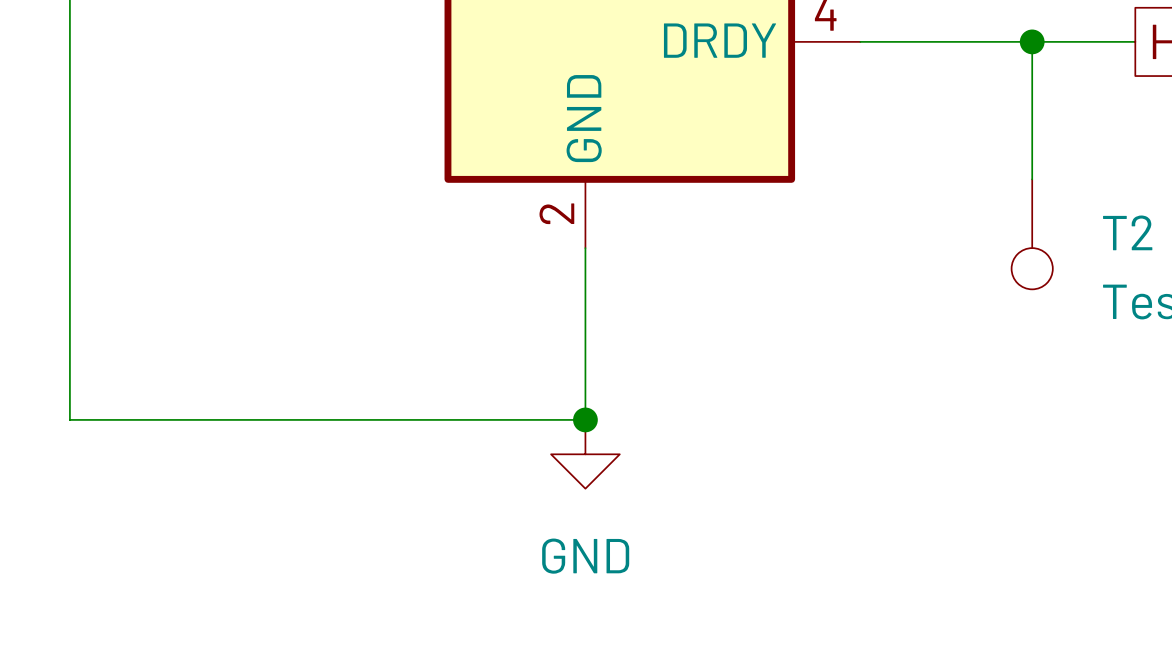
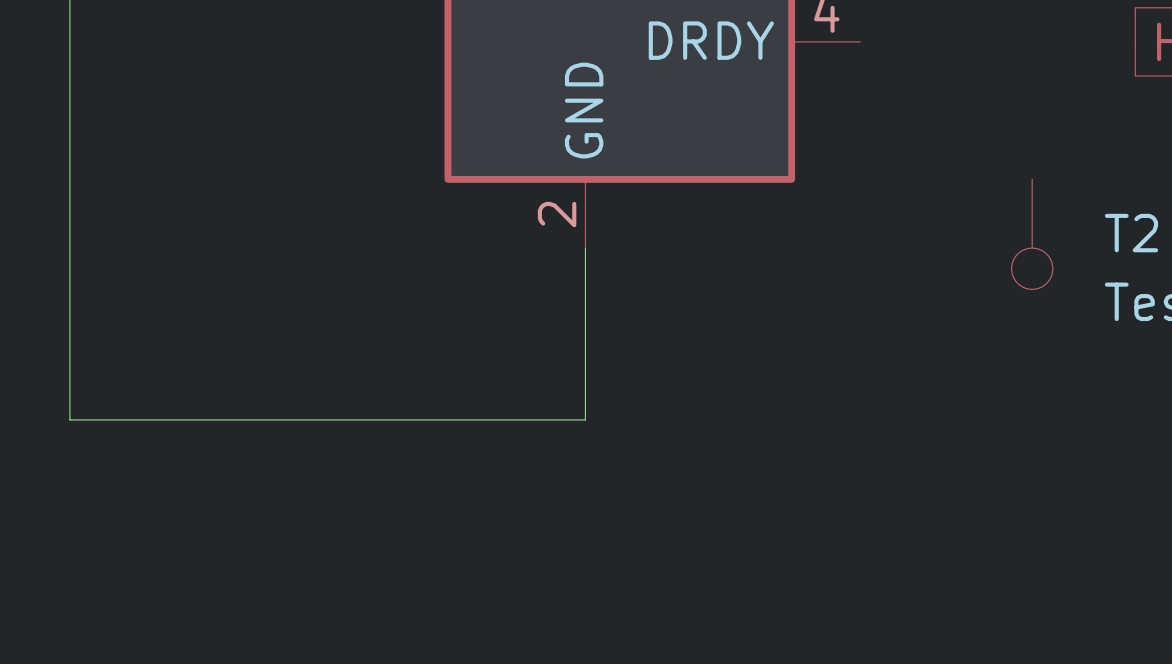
wire: (860, 41) (1135, 41) -> none
wire: (1032, 41) (1032, 179) -> none
junction: (1032, 41) -> none
junction: (585, 419) -> none
power symbol: GND (585, 454) -> none

